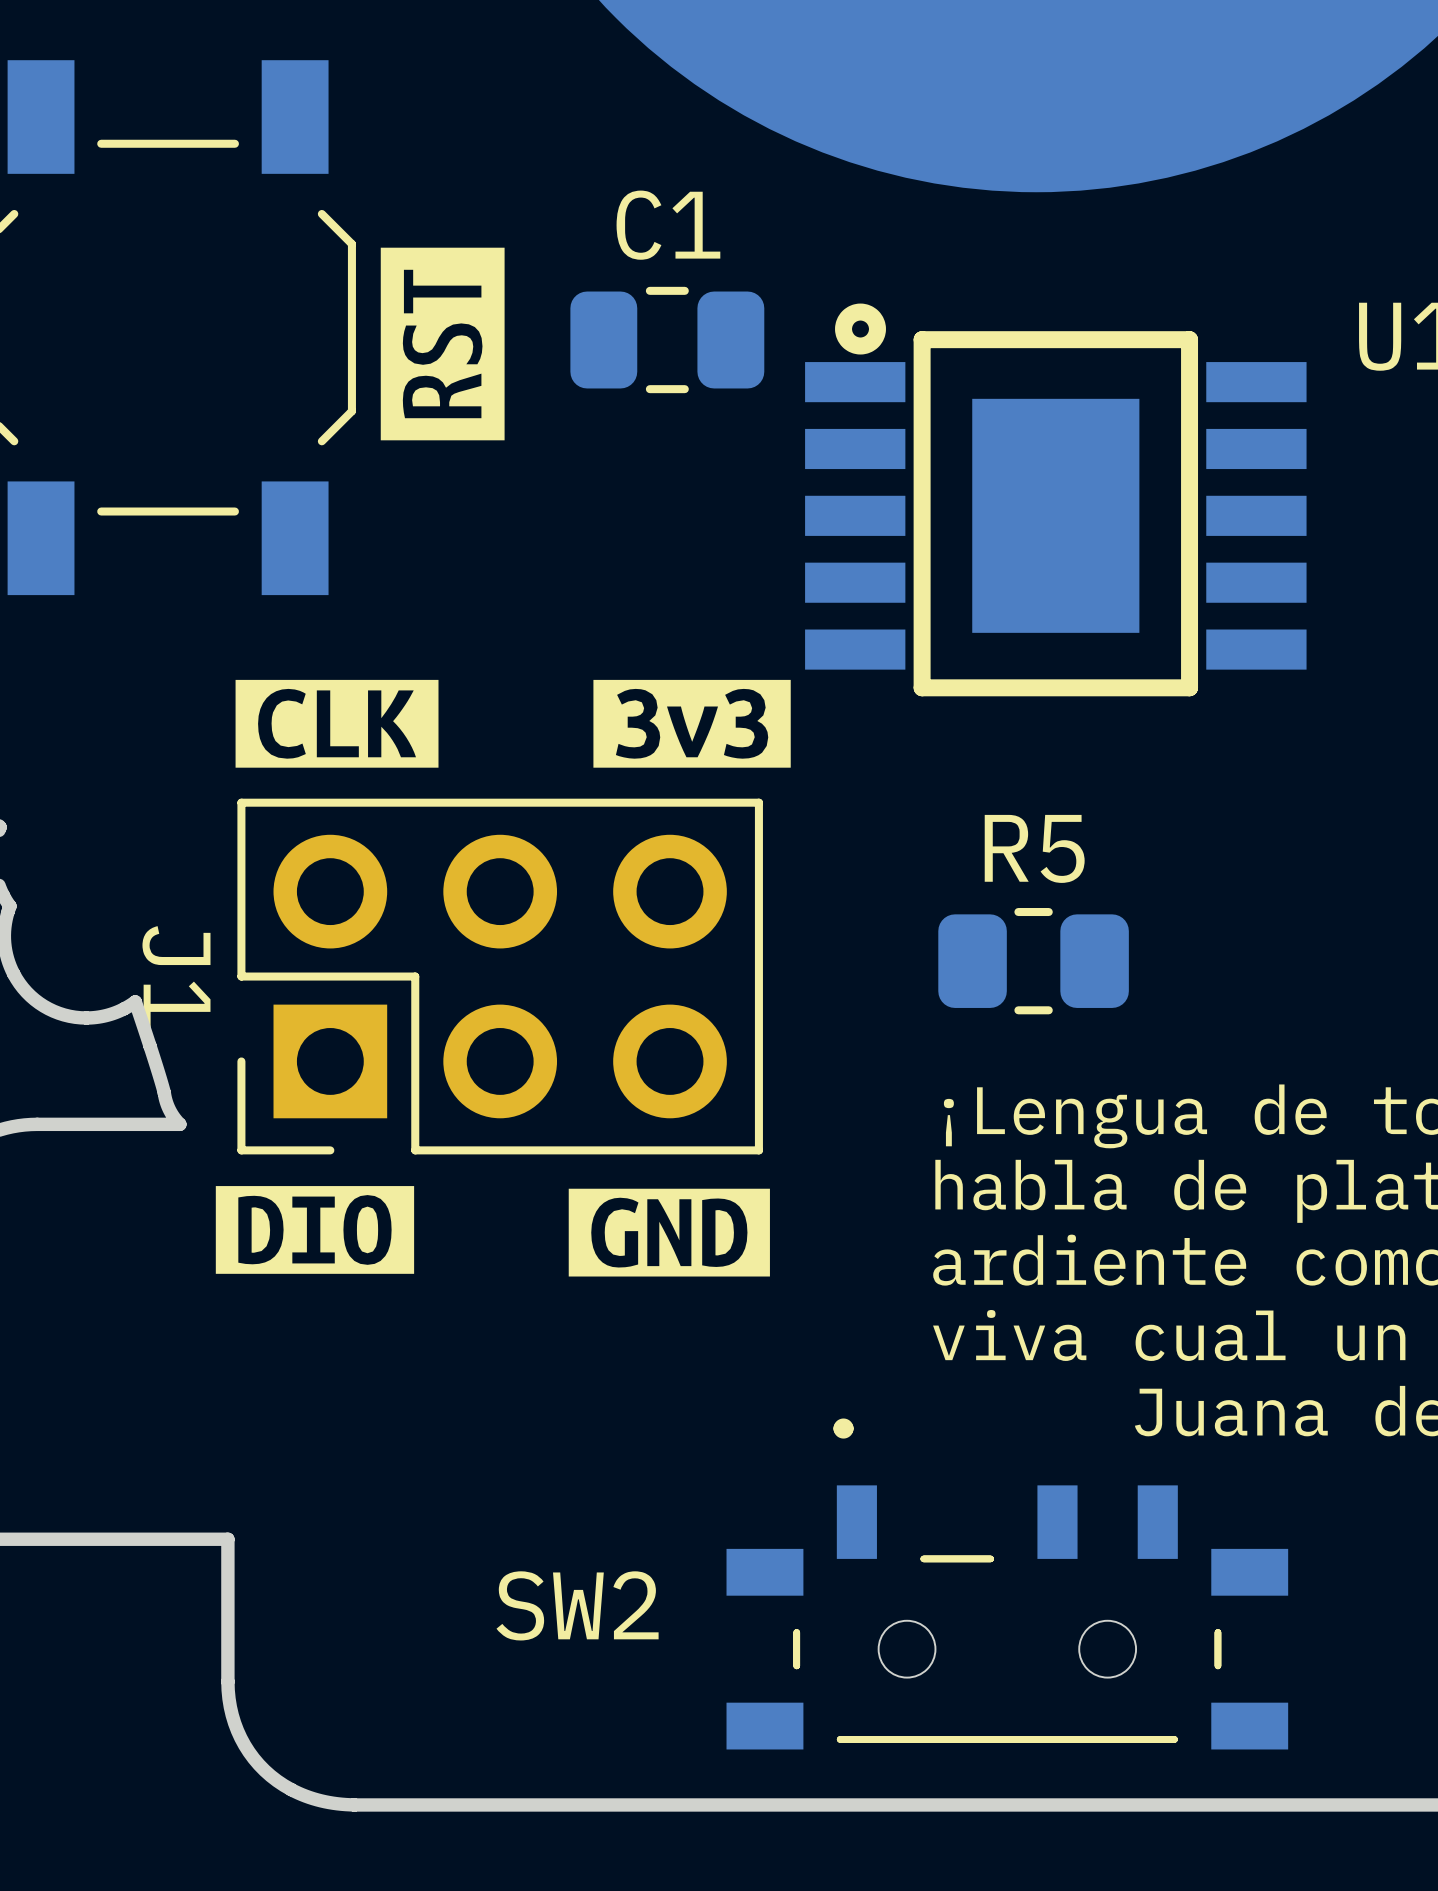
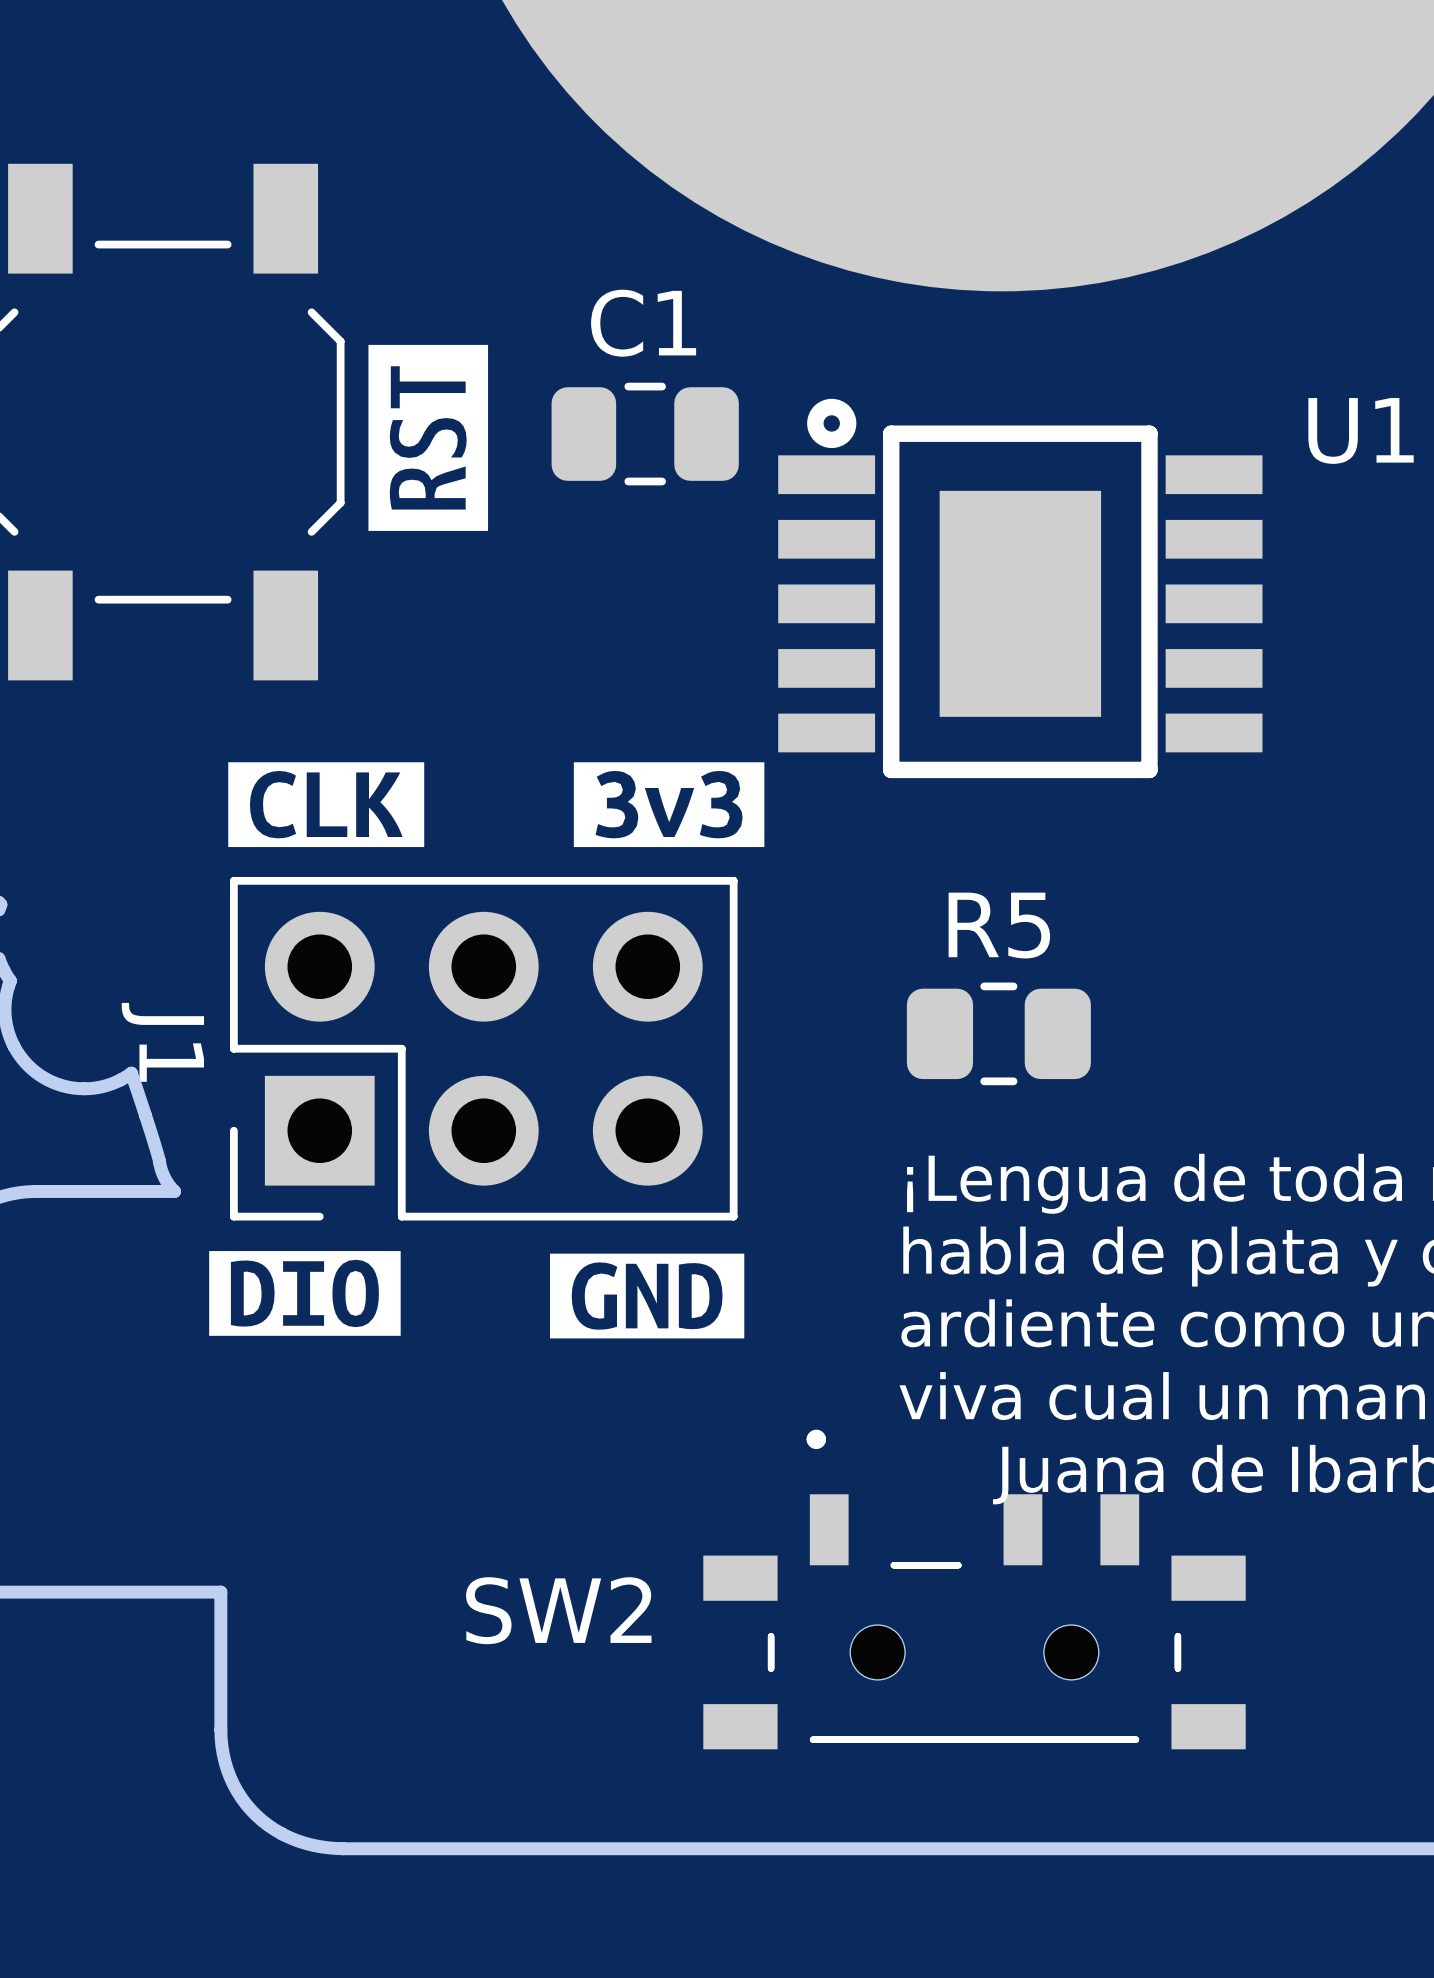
SW2 position: (1007, 1583) -> (974, 1589)

